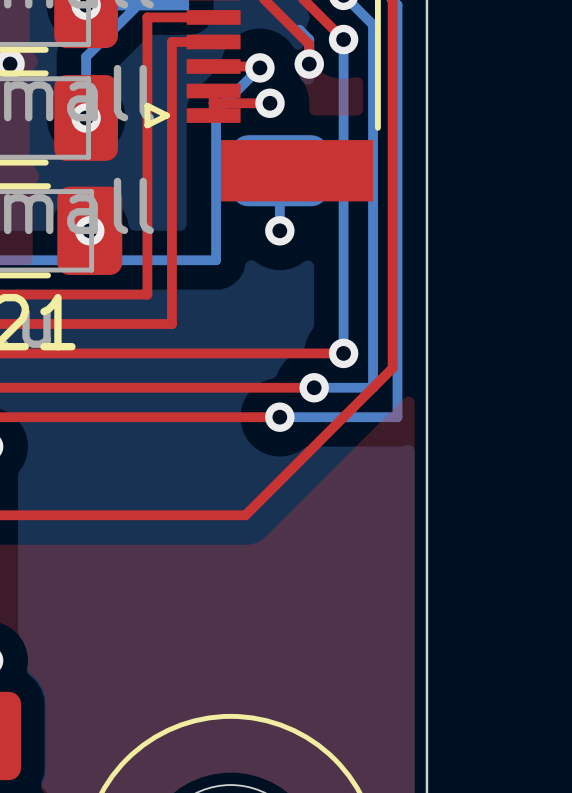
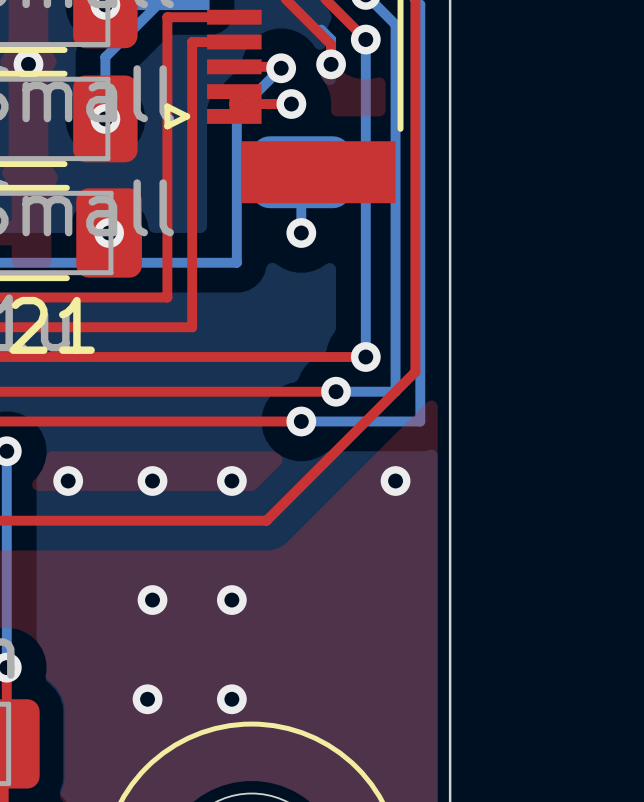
via: none -> (68, 481)
via: none -> (152, 481)
via: none -> (231, 481)
via: none -> (395, 481)
via: none -> (152, 600)
via: none -> (231, 600)
via: none -> (147, 699)
via: none -> (231, 699)

